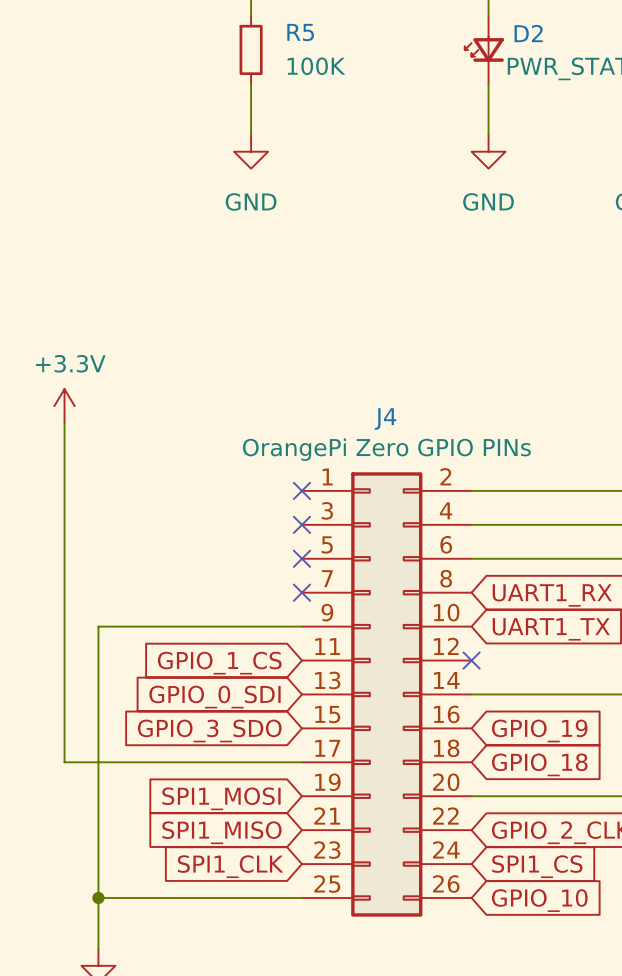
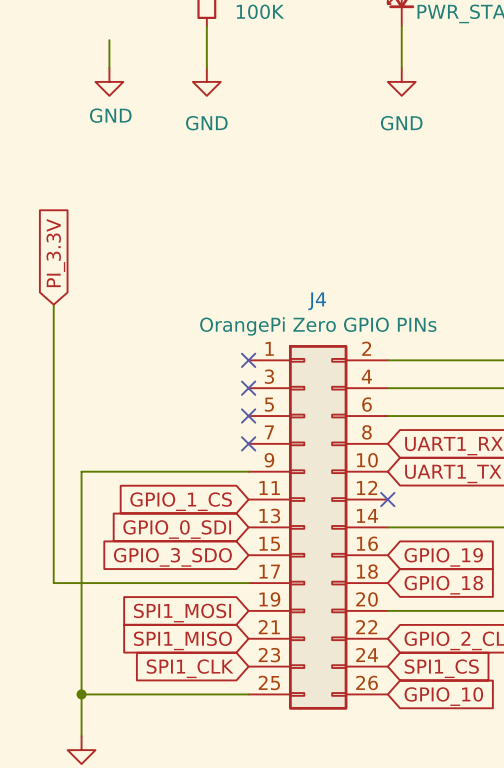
wire: none -> (109, 40) (109, 68)
power symbol: none -> GND (109, 81)
global label: none -> PI_3.3V (55, 253)
power symbol: +3.3V (64, 406) -> none

